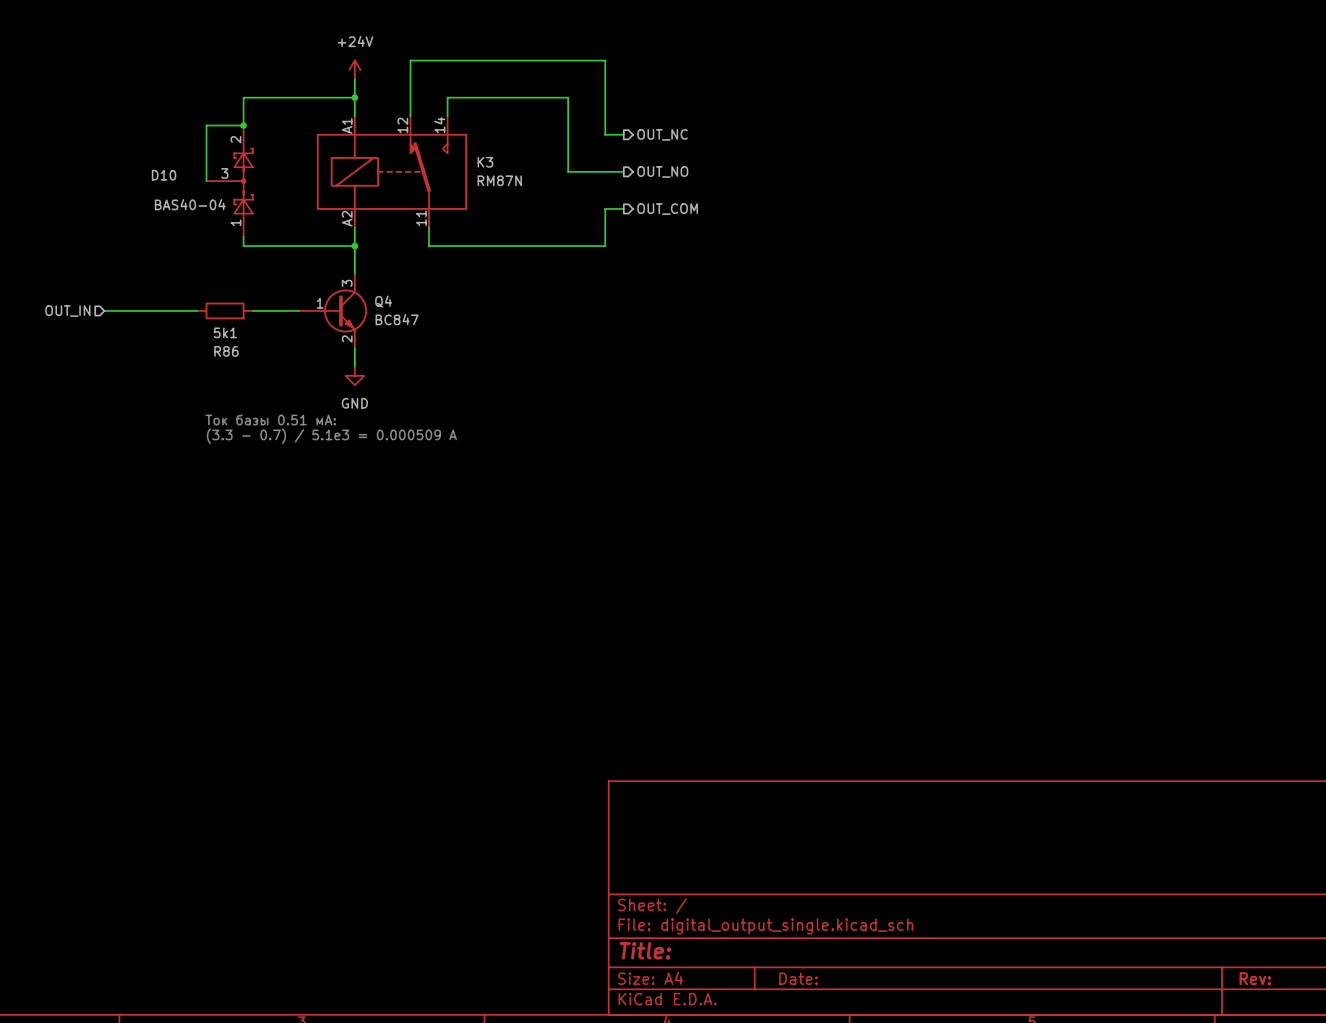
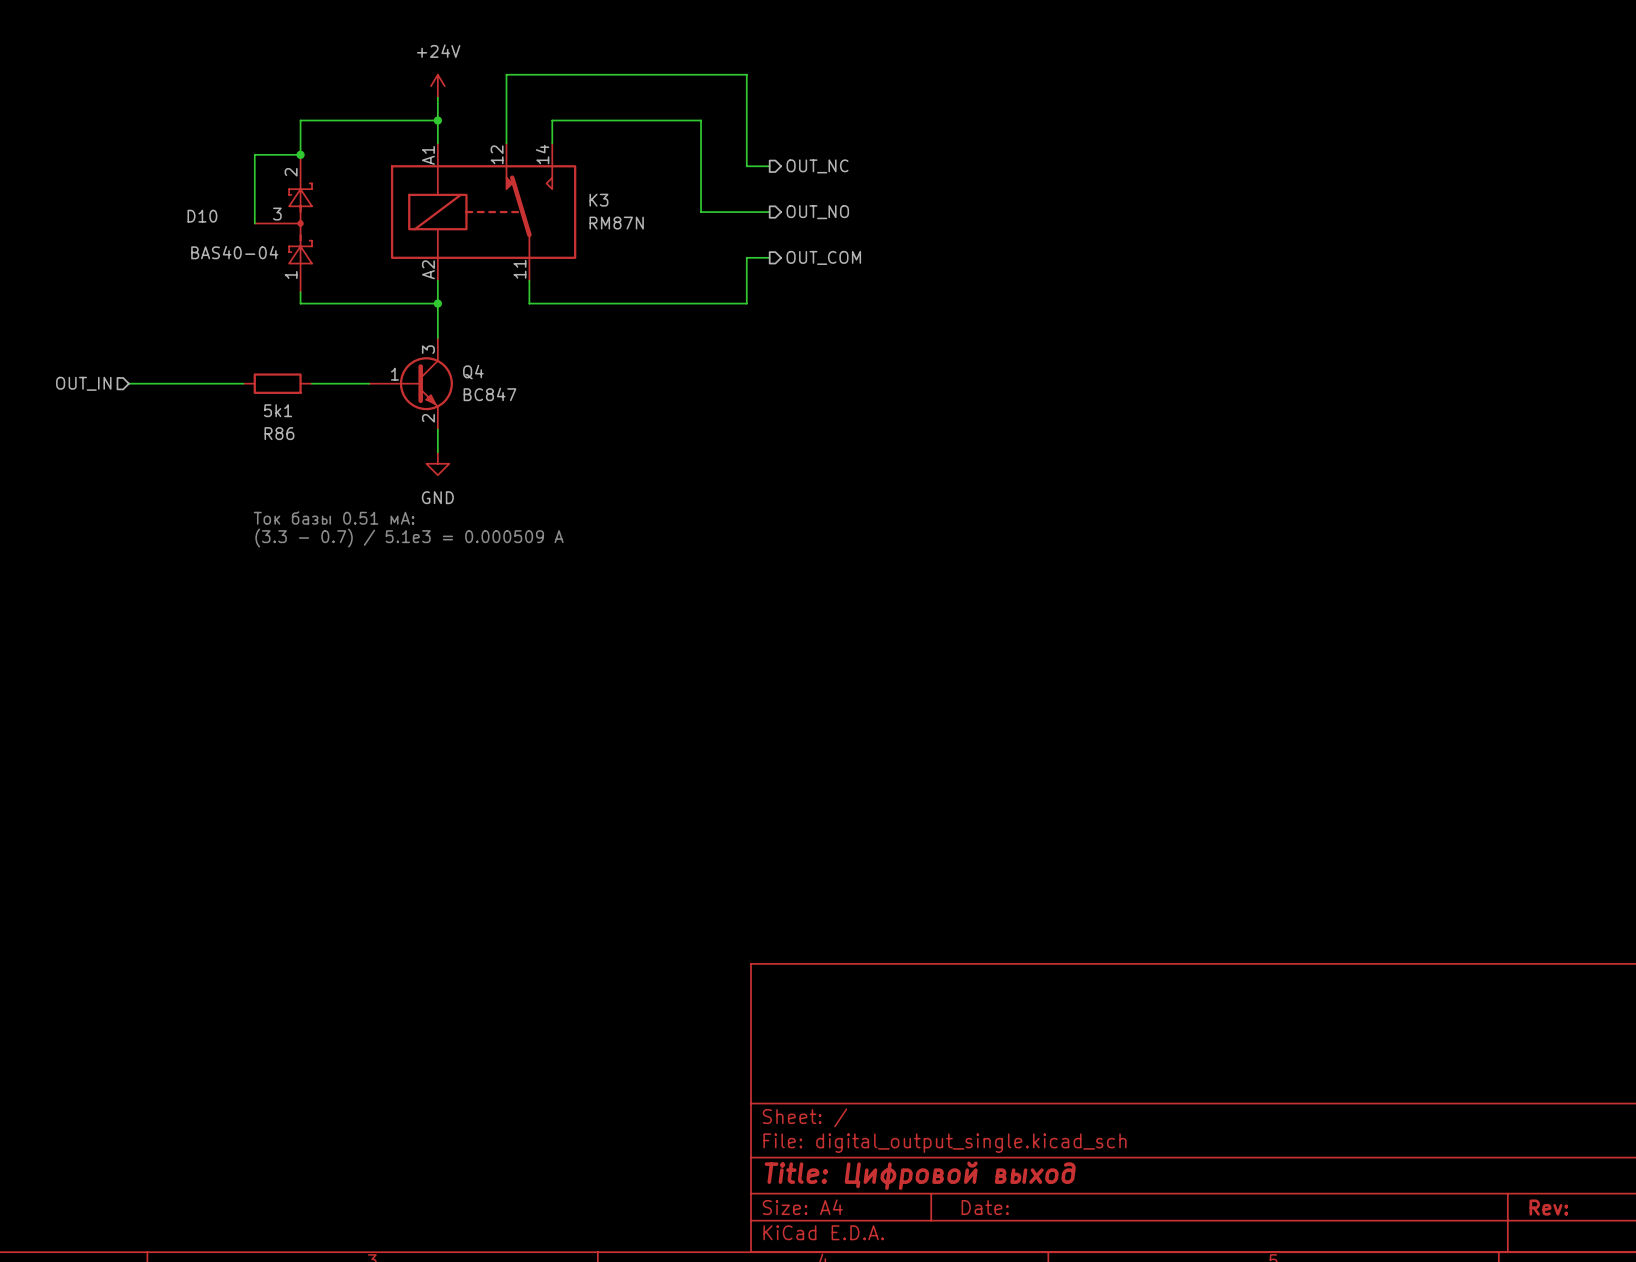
title block: Title: (645, 950) -> Title: Цифровой выход (920, 1175)

